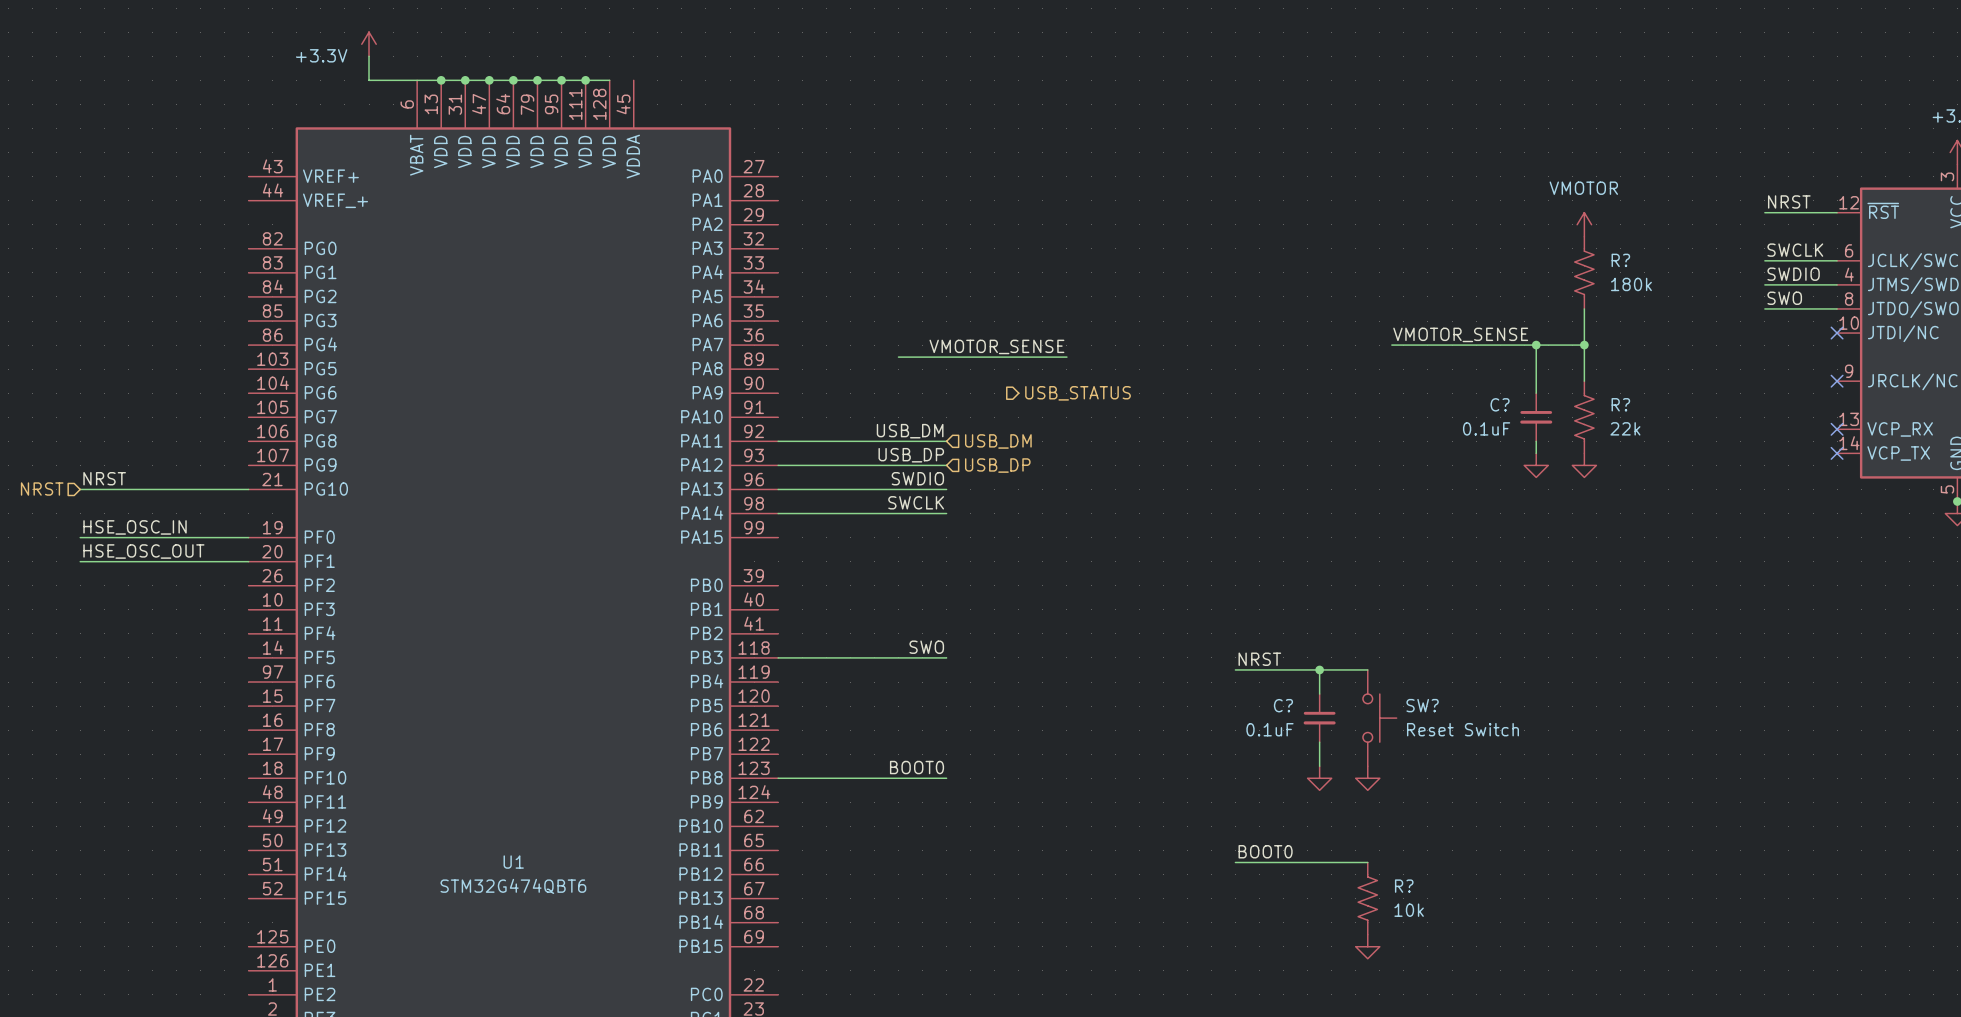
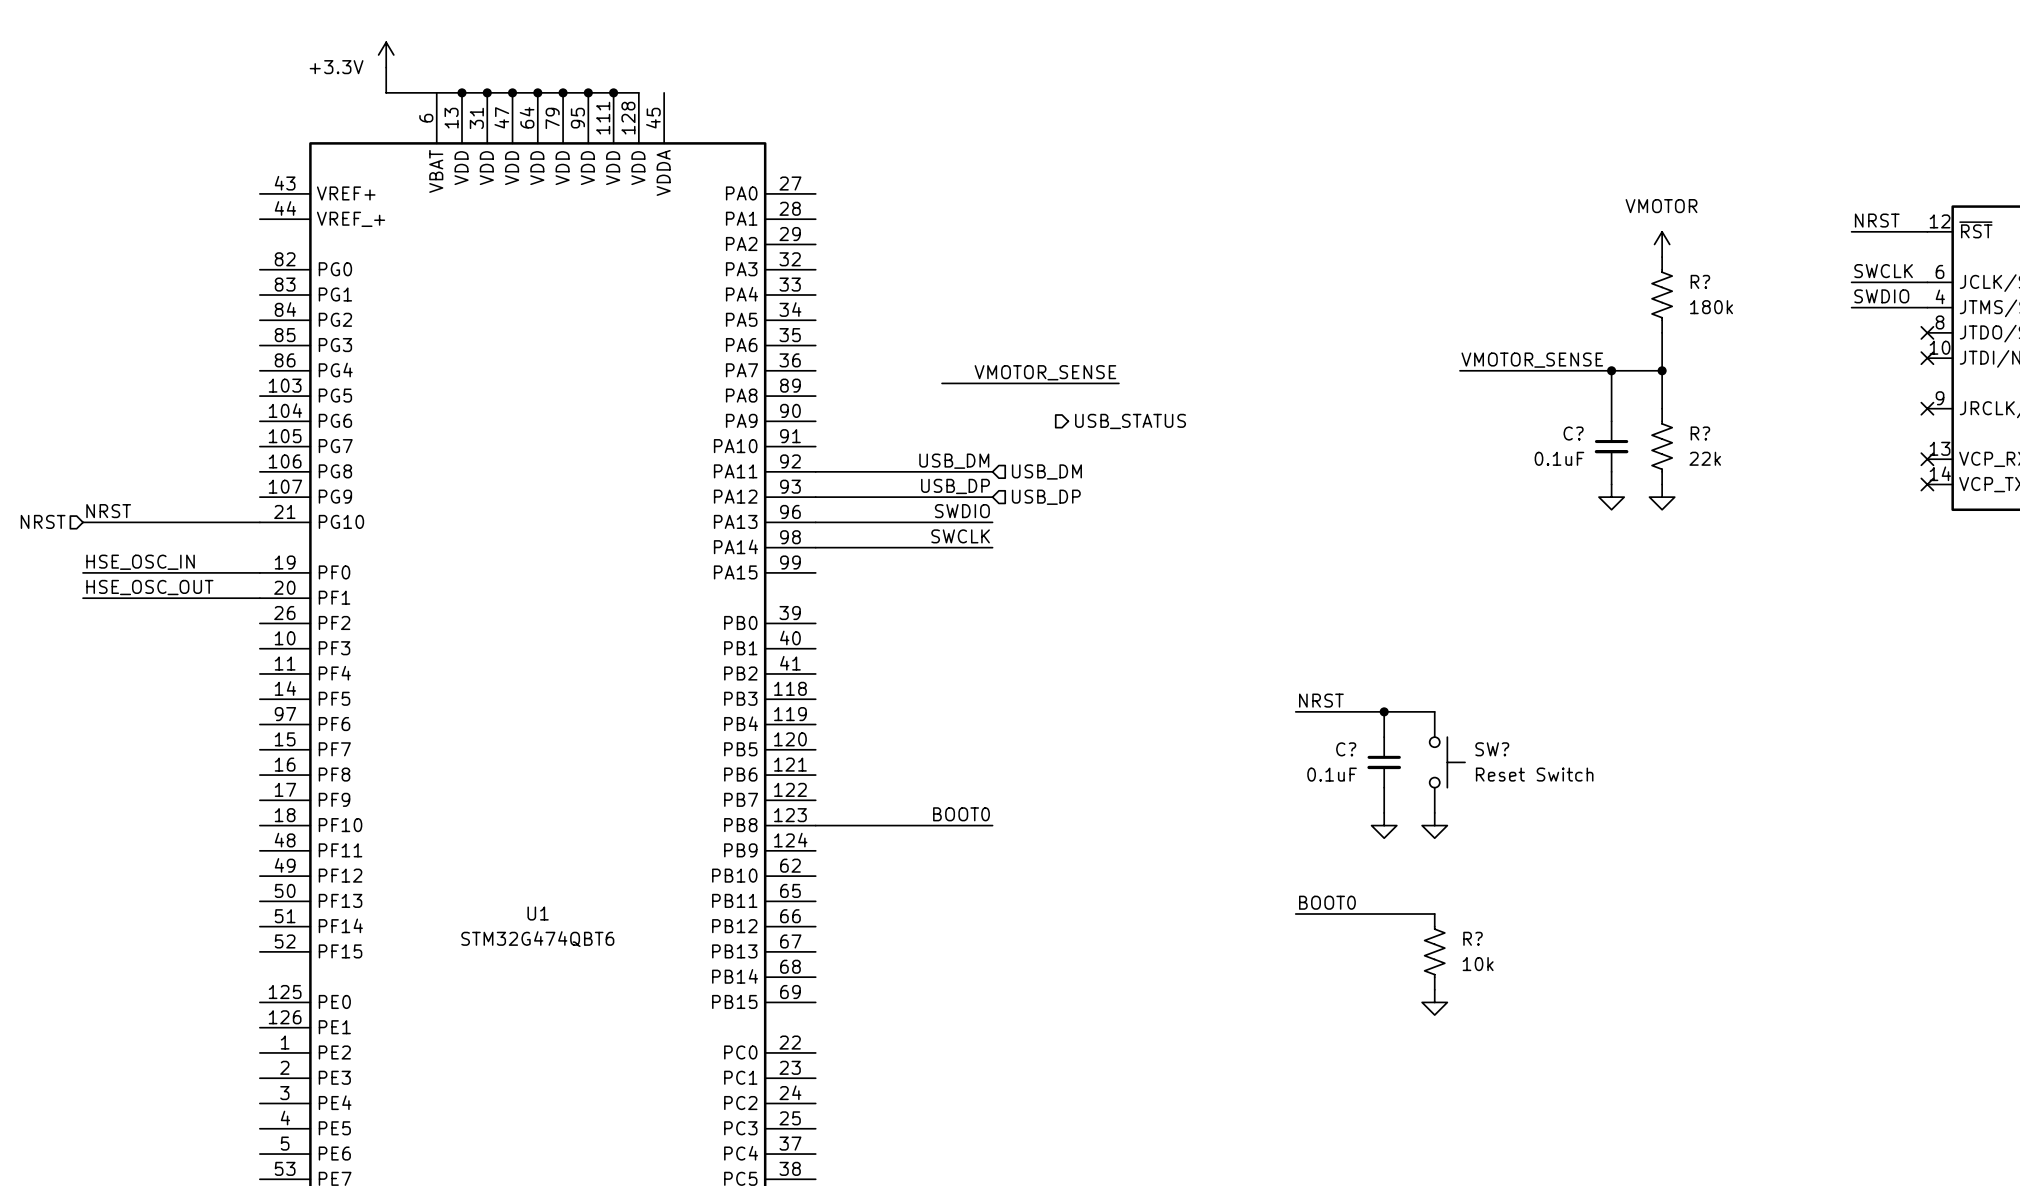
label: SWO (1784, 298) -> none
wire: (1764, 308) (1837, 308) -> none
no-connect mark: none -> (1927, 332)
label: SWO (926, 647) -> none
wire: (778, 657) (946, 657) -> none

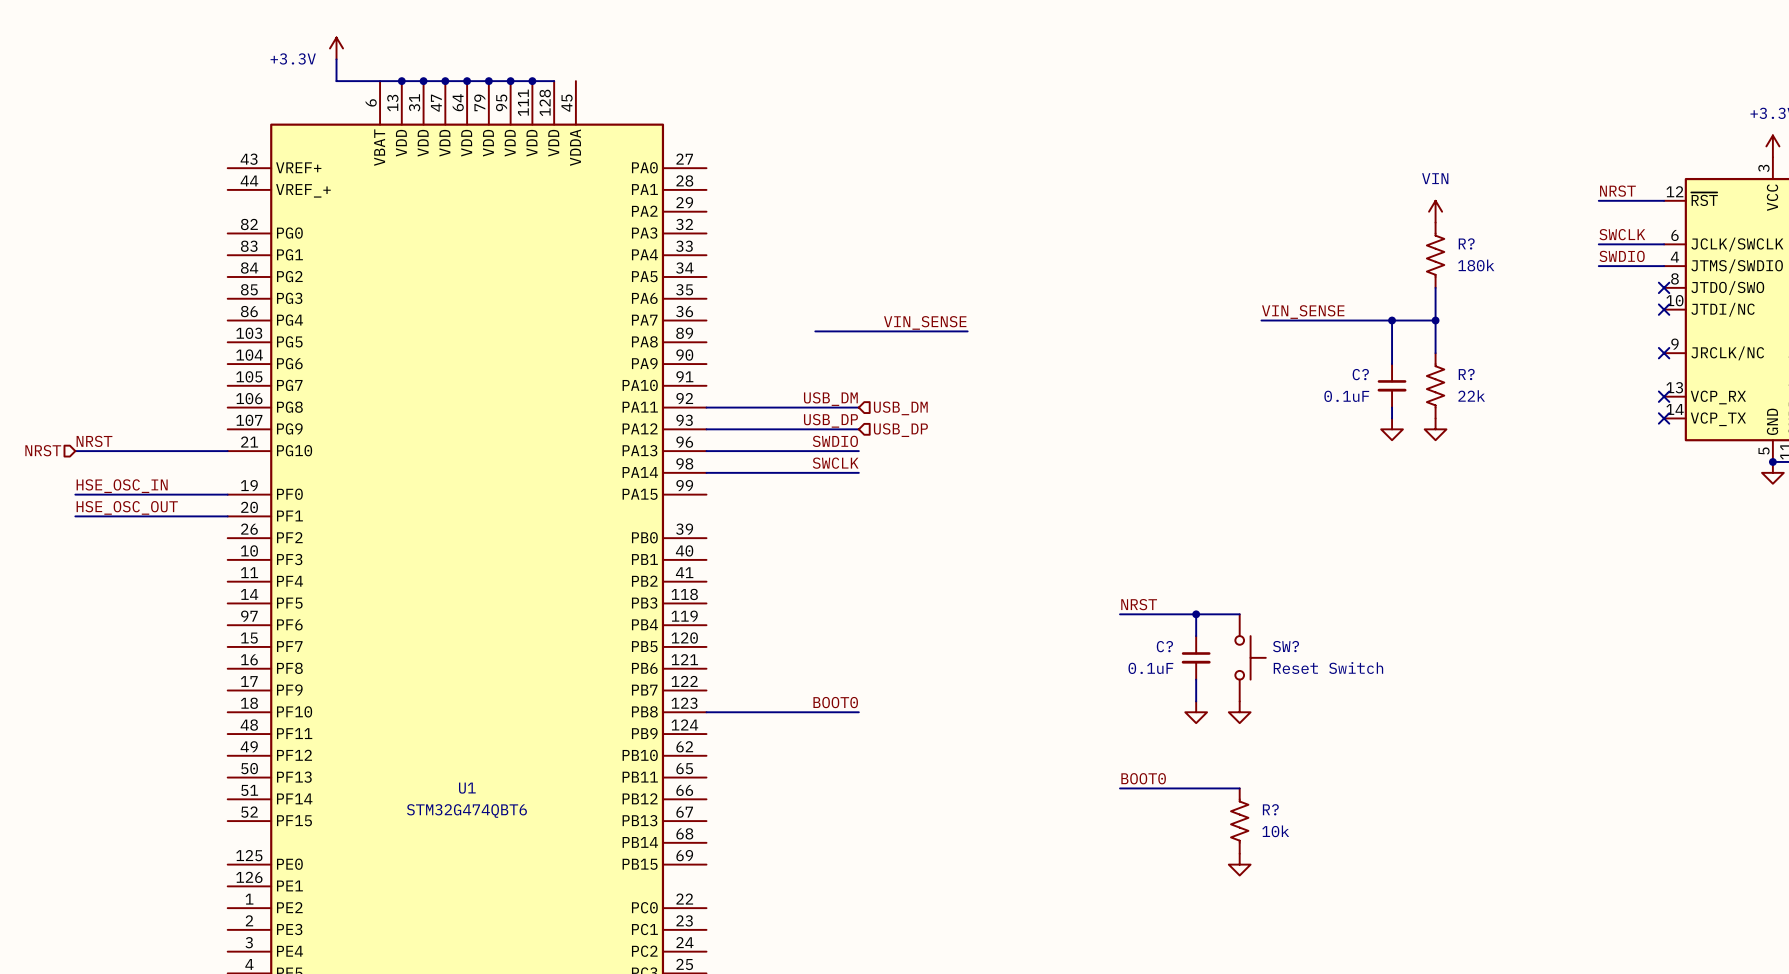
power symbol: VMOTOR (1662, 244) -> VIN (1435, 211)
label: VMOTOR_SENSE (1532, 360) -> VIN_SENSE (1303, 312)
label: VMOTOR_SENSE (1045, 372) -> VIN_SENSE (925, 322)
hierarchical label: USB_STATUS (1130, 421) -> none

